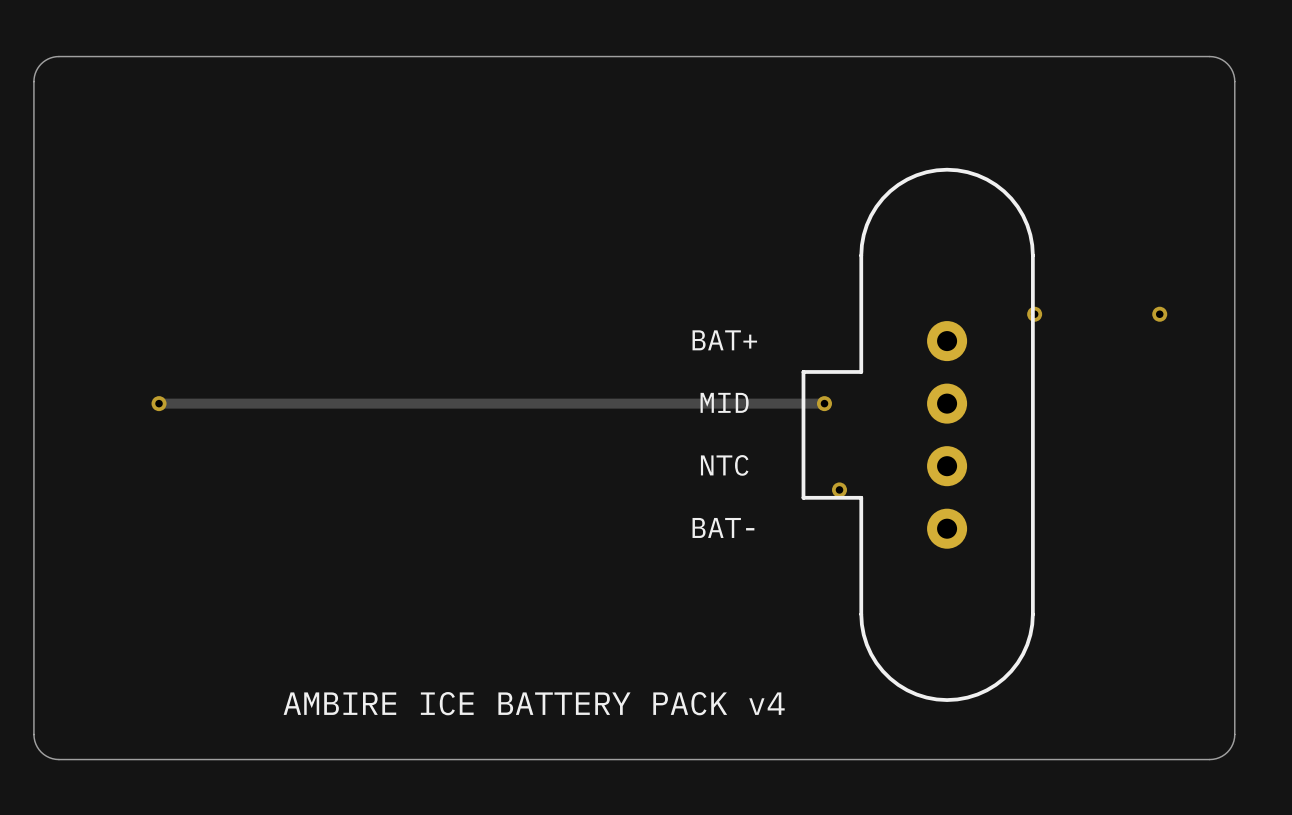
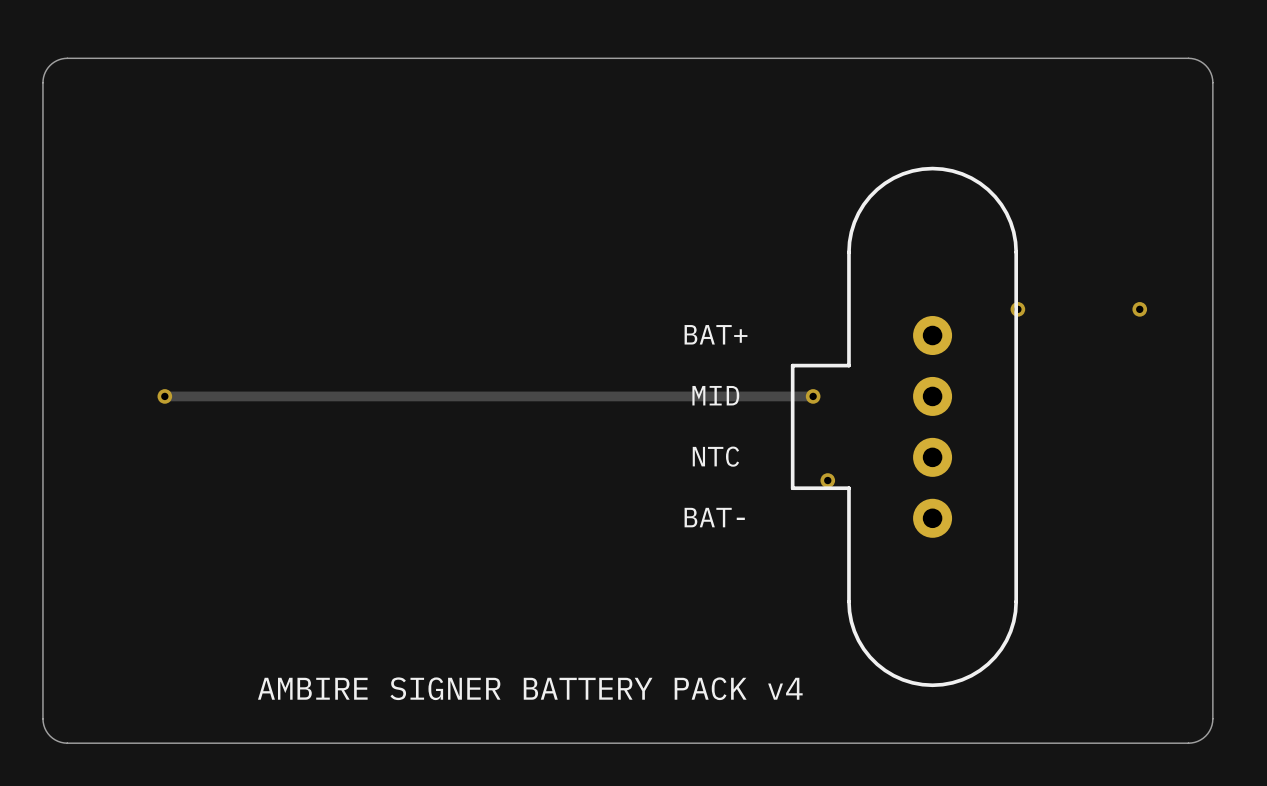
text: AMBIRE ICE BATTERY PACK v4 (534, 703) -> AMBIRE SIGNER BATTERY PACK v4 (530, 688)

